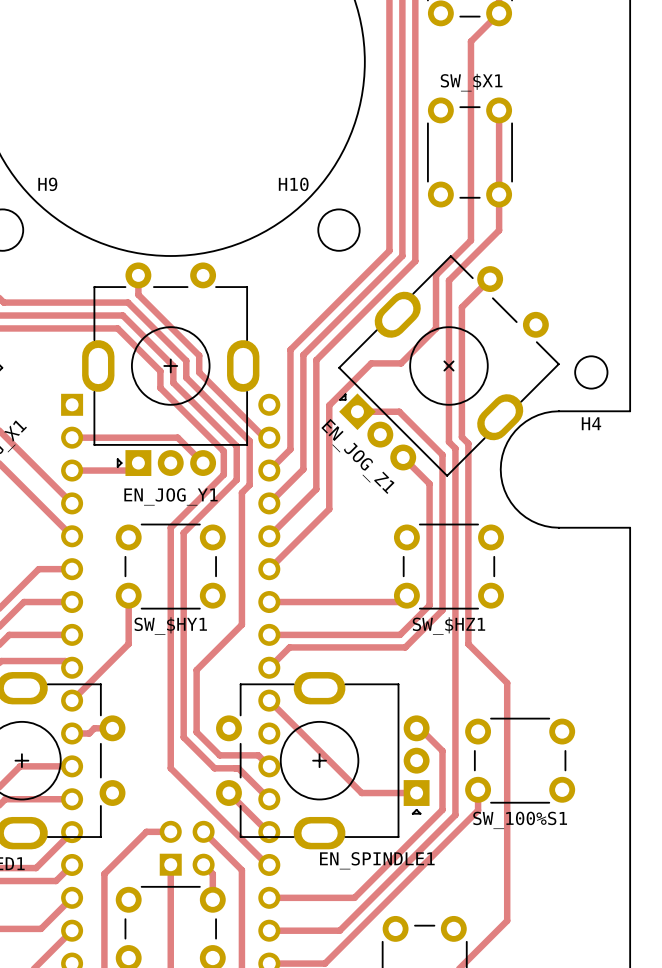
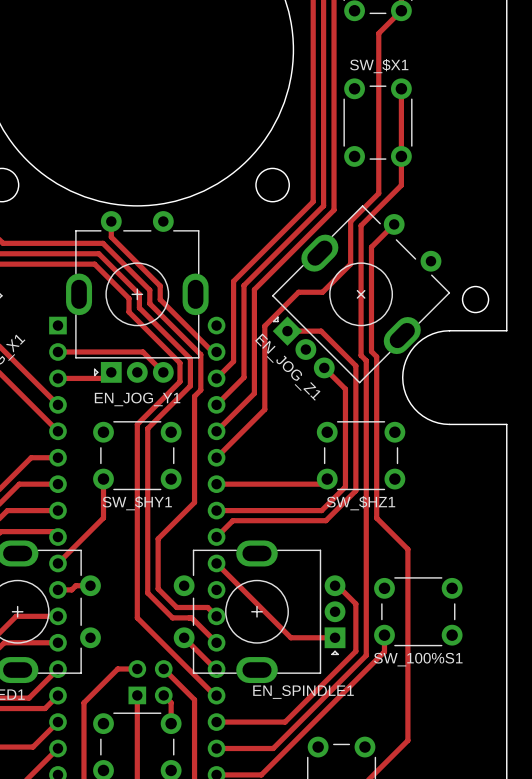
H9 name: H9 (47, 184) -> none
H10 name: H10 (293, 184) -> none
H4 name: H4 (591, 423) -> none

